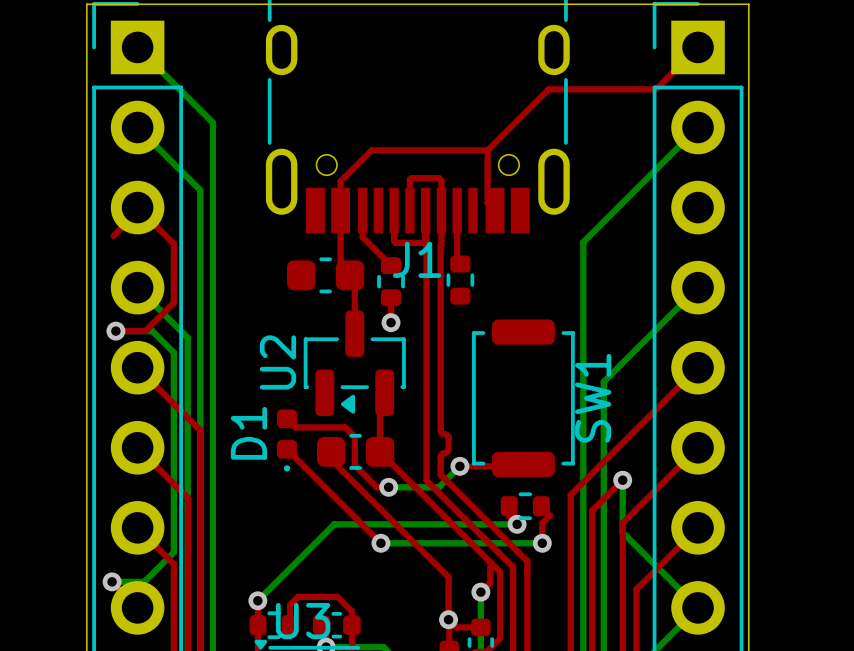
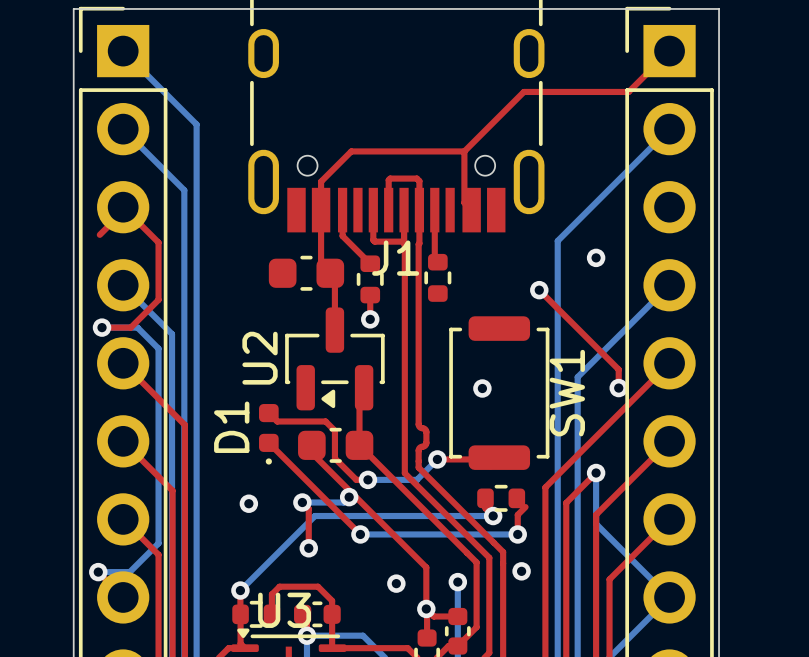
via: none -> (596, 257)
top track: none -> (539, 290) (618, 369) (618, 388)
via: none -> (539, 290)
via: none -> (482, 388)
via: none -> (618, 388)
bottom track: none -> (349, 497) (343, 502) (302, 502)
via: none -> (349, 497)
top track: none -> (302, 502) (308, 508) (308, 548)
via: none -> (302, 502)
via: none -> (248, 503)
via: none -> (308, 548)
top track: (490, 562) (490, 582) (480, 592) -> none
via: none -> (521, 571)
via: none -> (396, 583)

